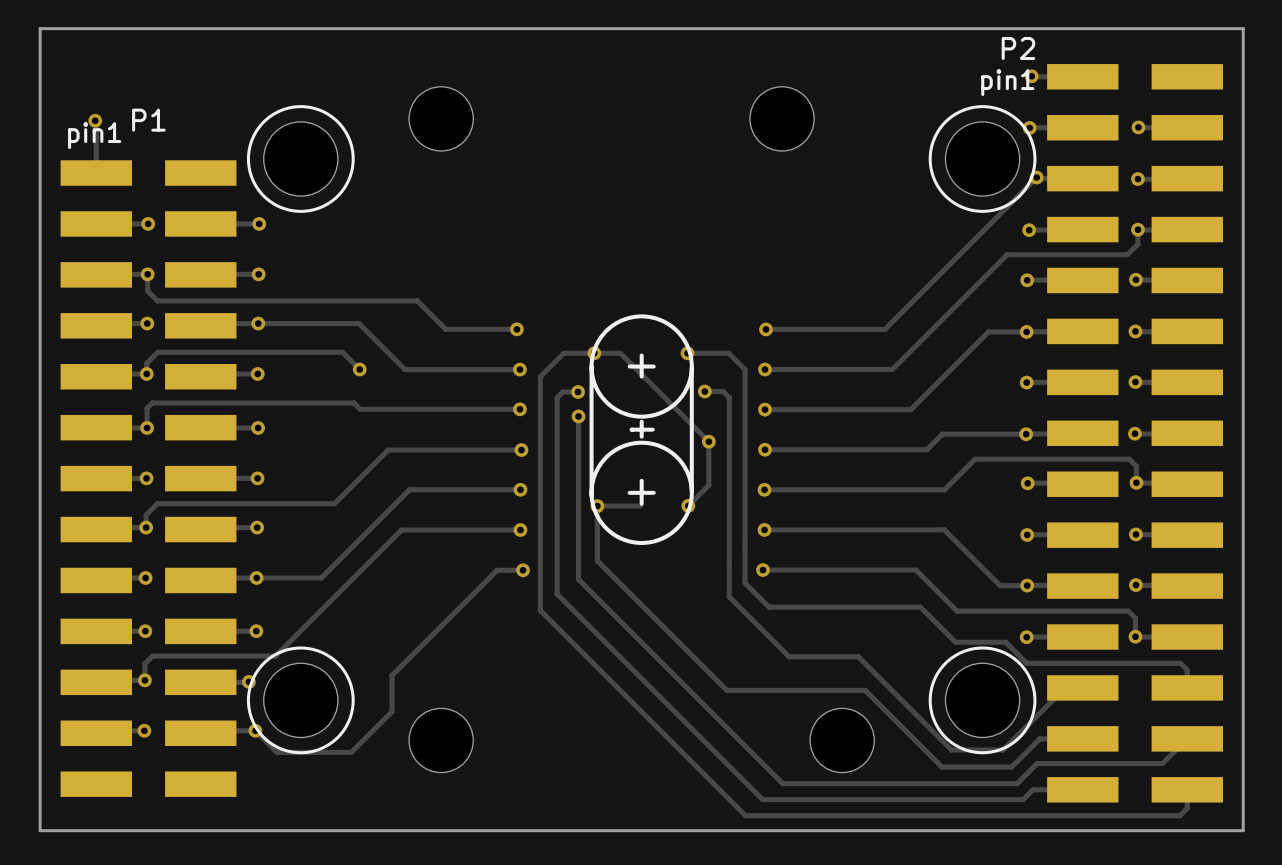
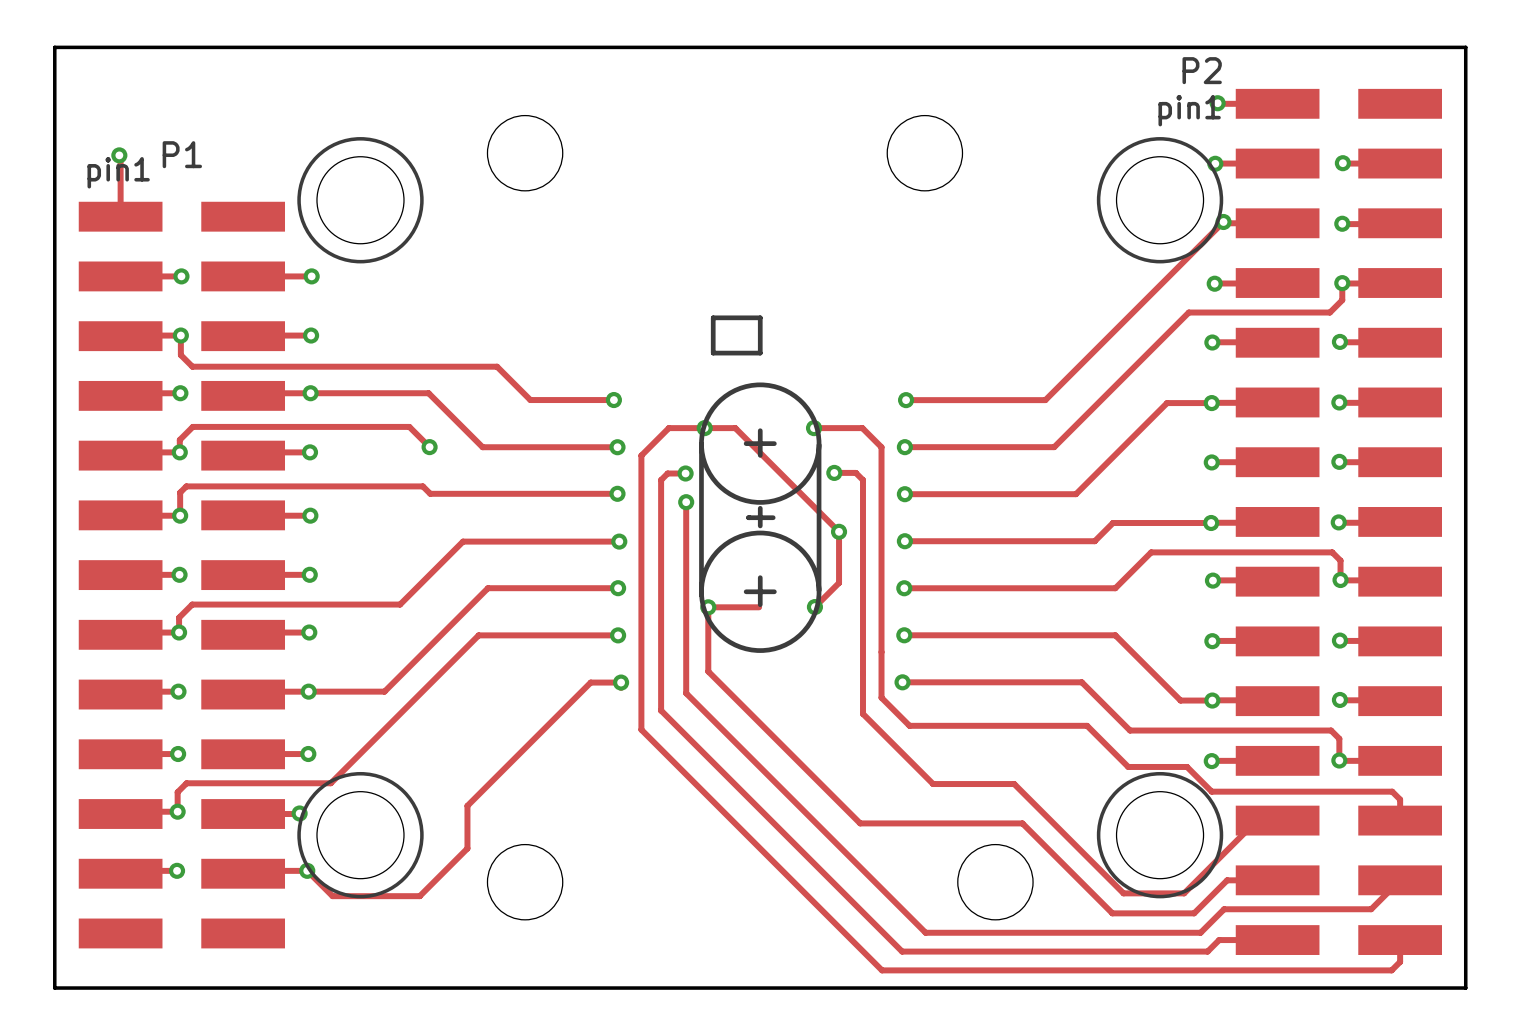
line: none -> (713, 317) (713, 353) (760, 353) (760, 317) (713, 317)

